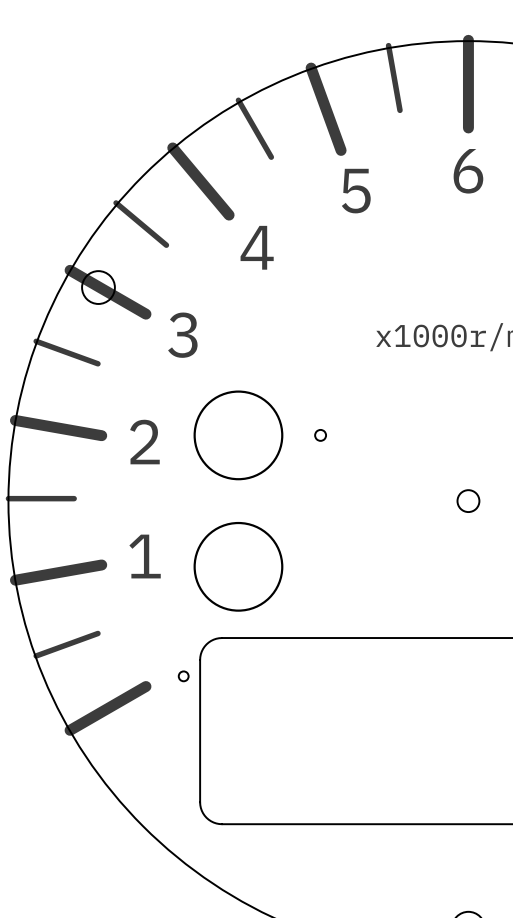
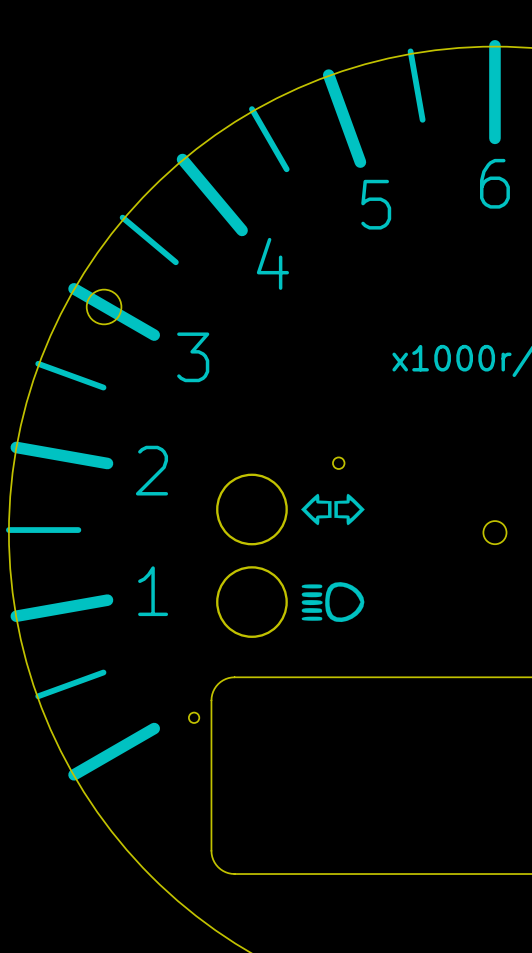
round board edge: [193, 390, 284, 481] -> none
round board edge: none -> [216, 473, 288, 546]
drawing: none -> [301, 493, 365, 526]
round board edge size: [193, 521, 284, 612] -> [216, 566, 288, 638]
drawing: none -> [301, 582, 365, 623]

